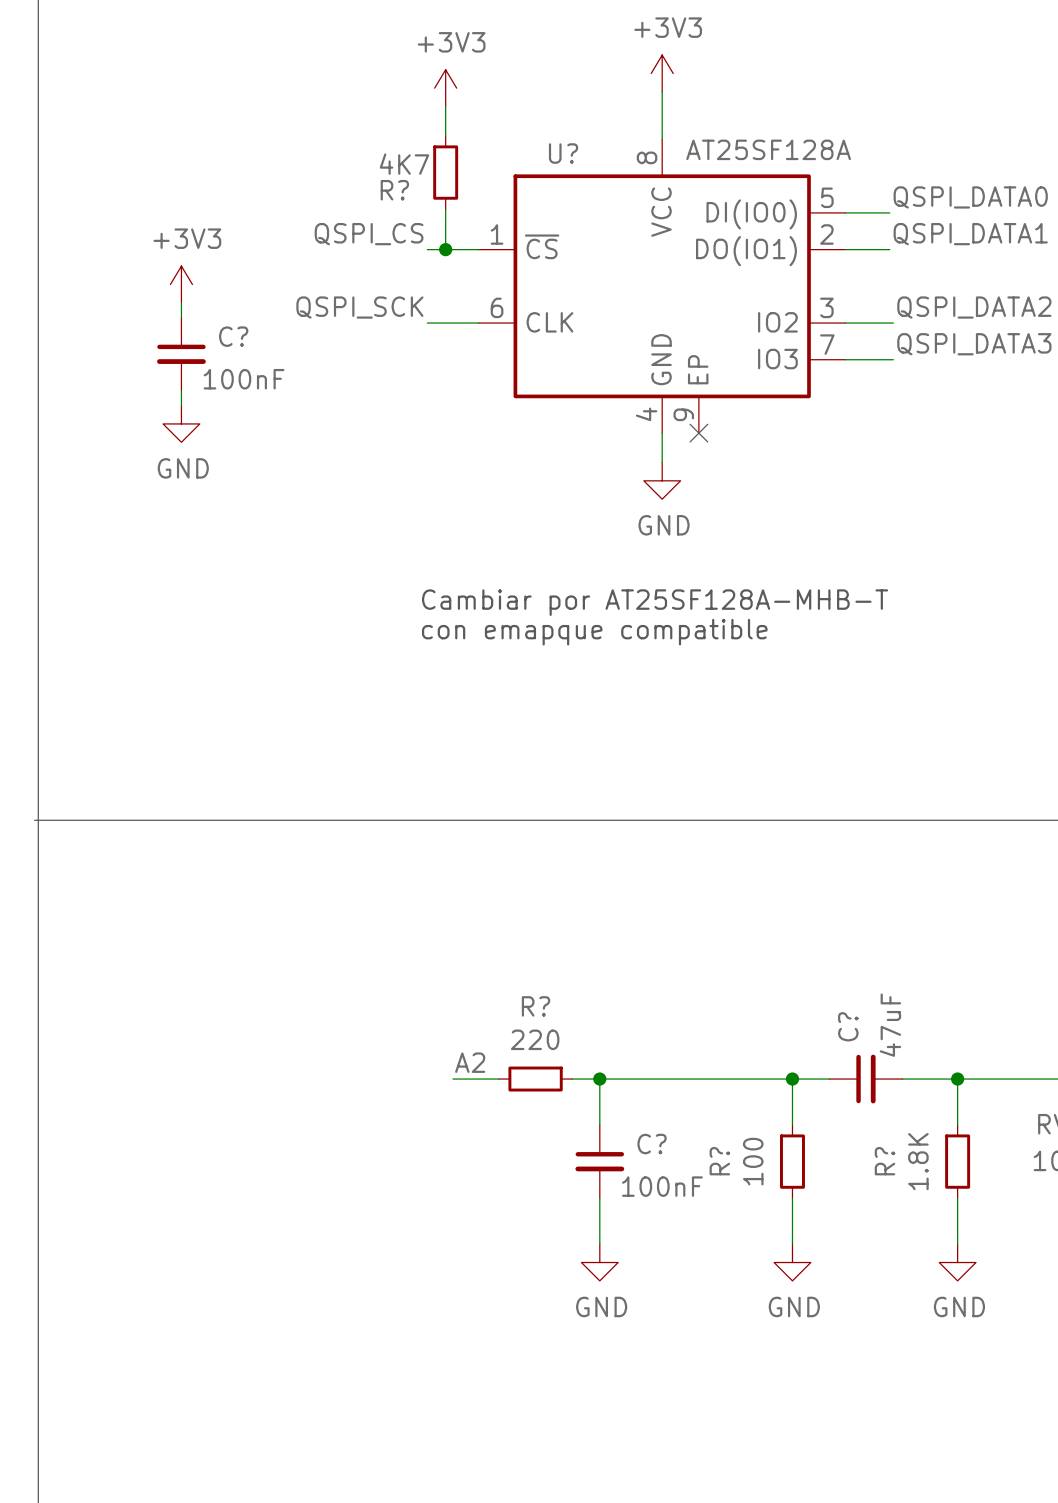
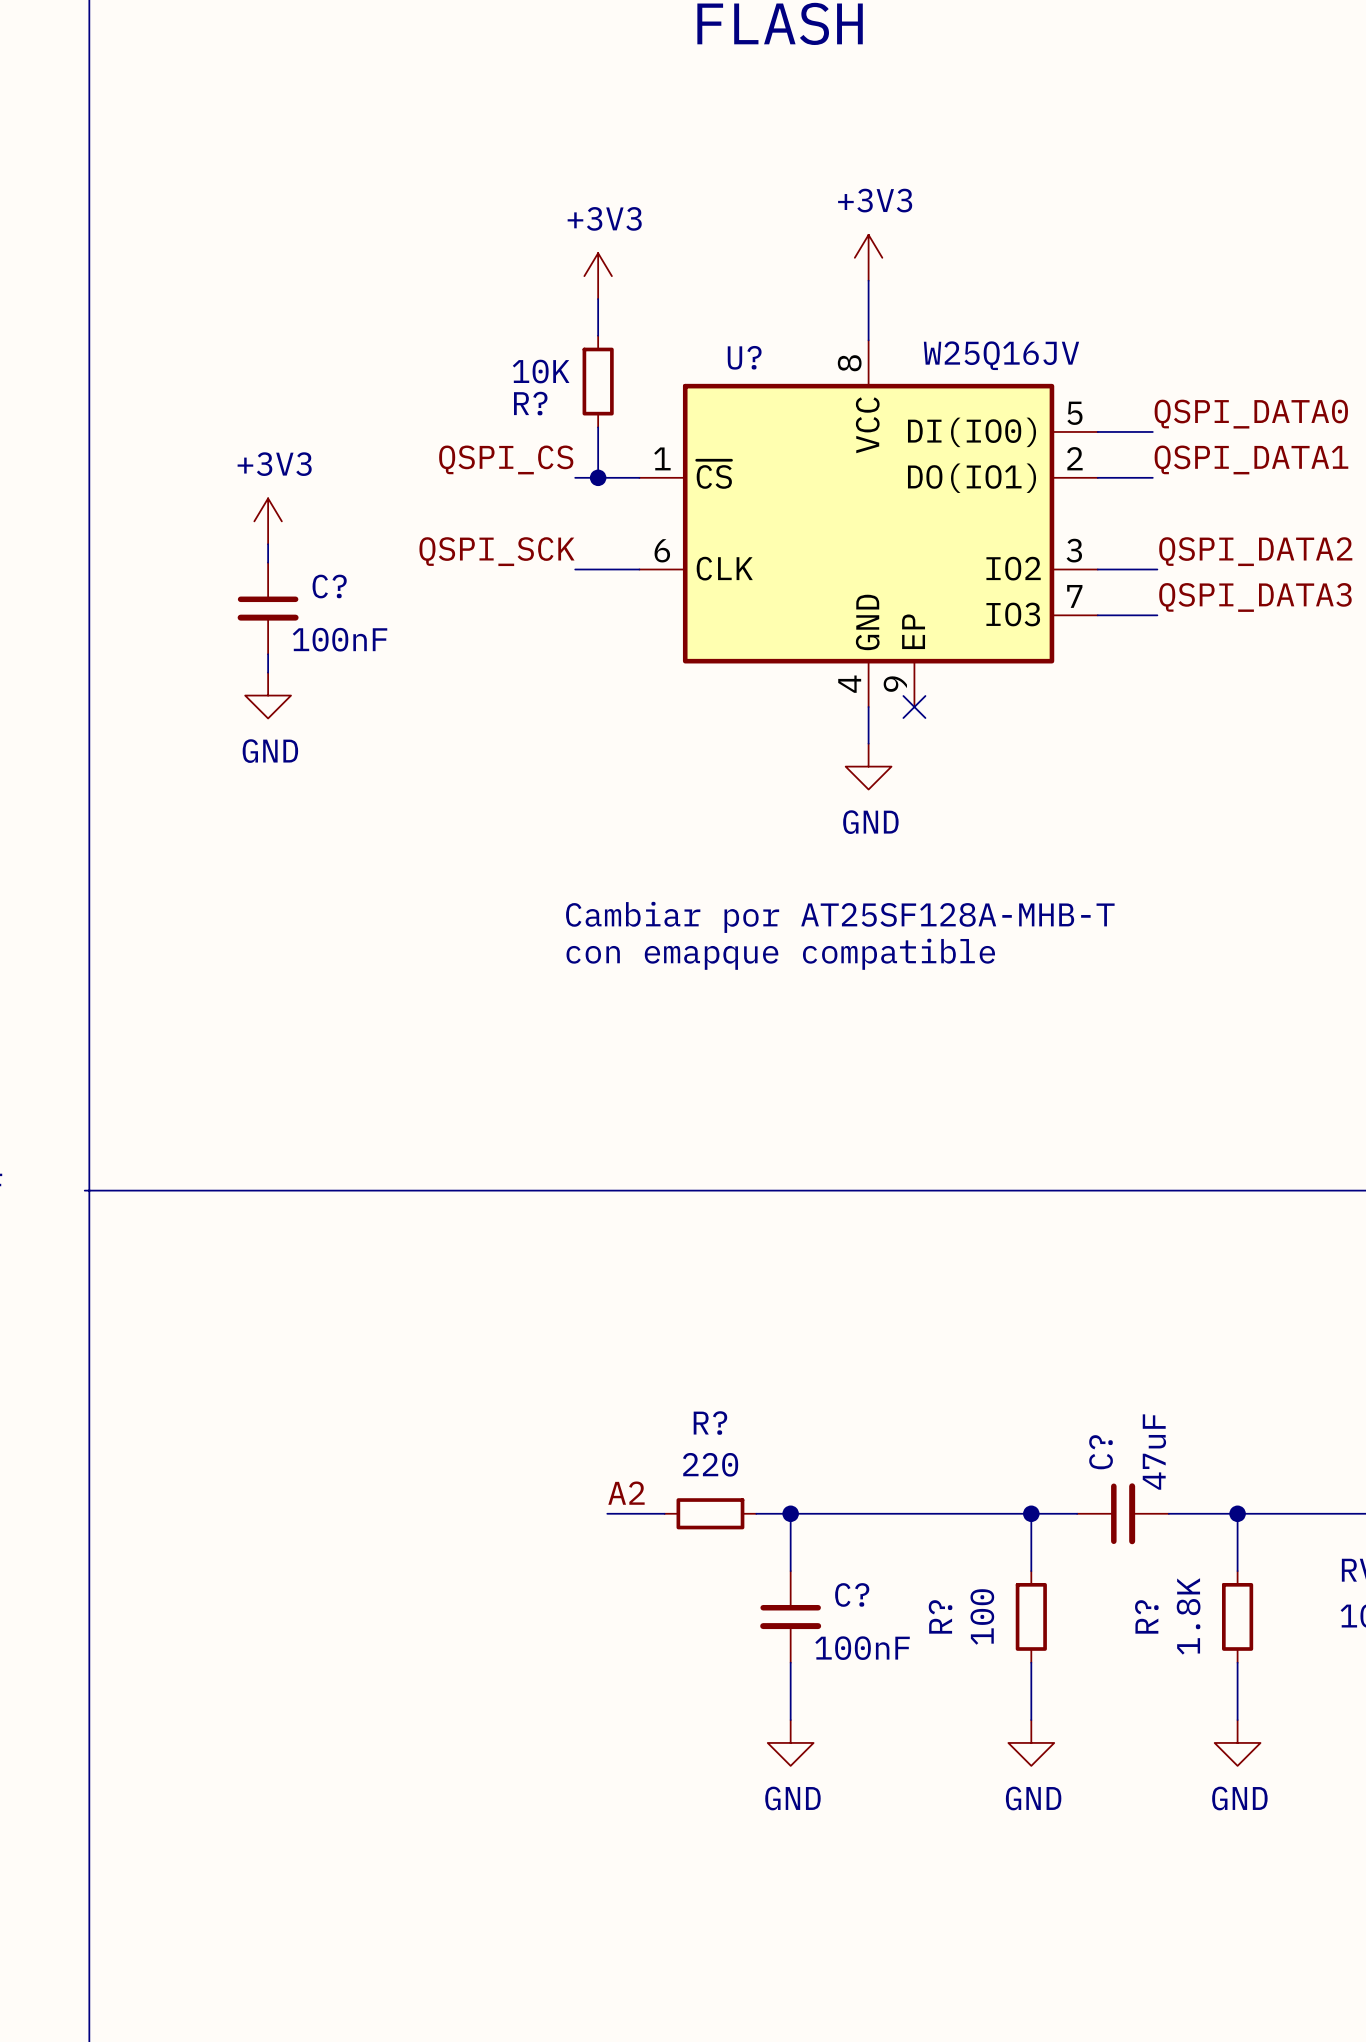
U? value: AT25SF128A (768, 149) -> W25Q16JV (1001, 355)
R? value: 4K7 (404, 164) -> 10K (541, 371)

